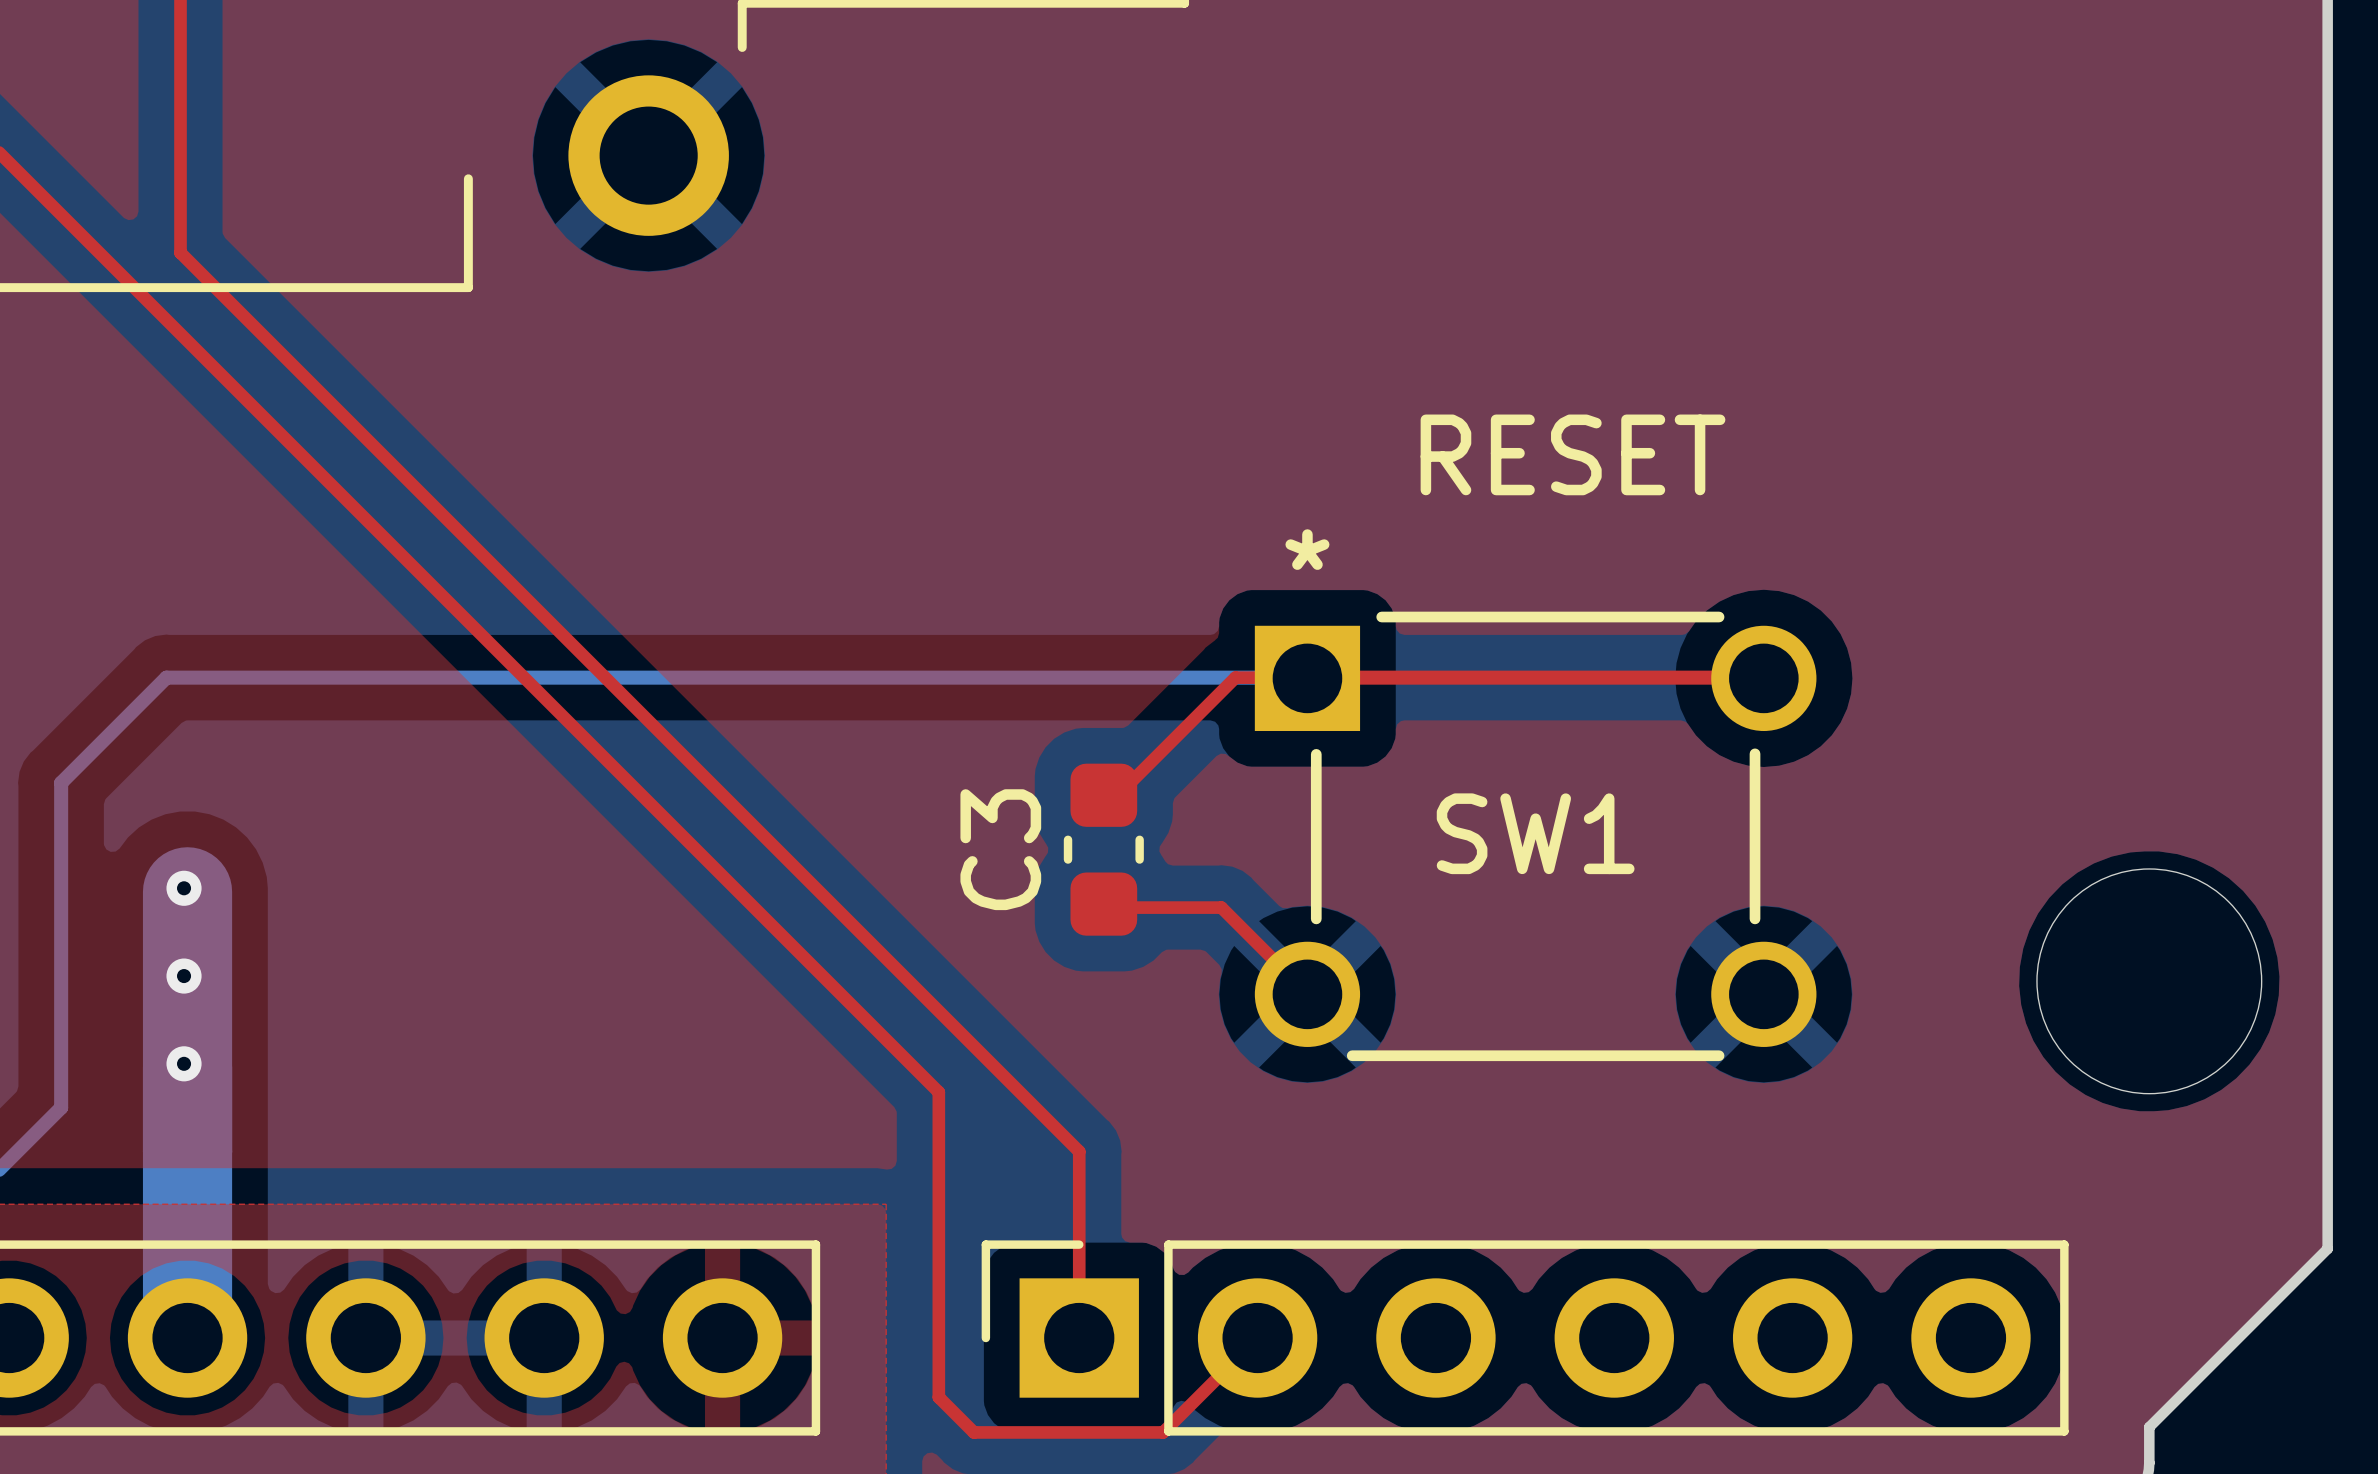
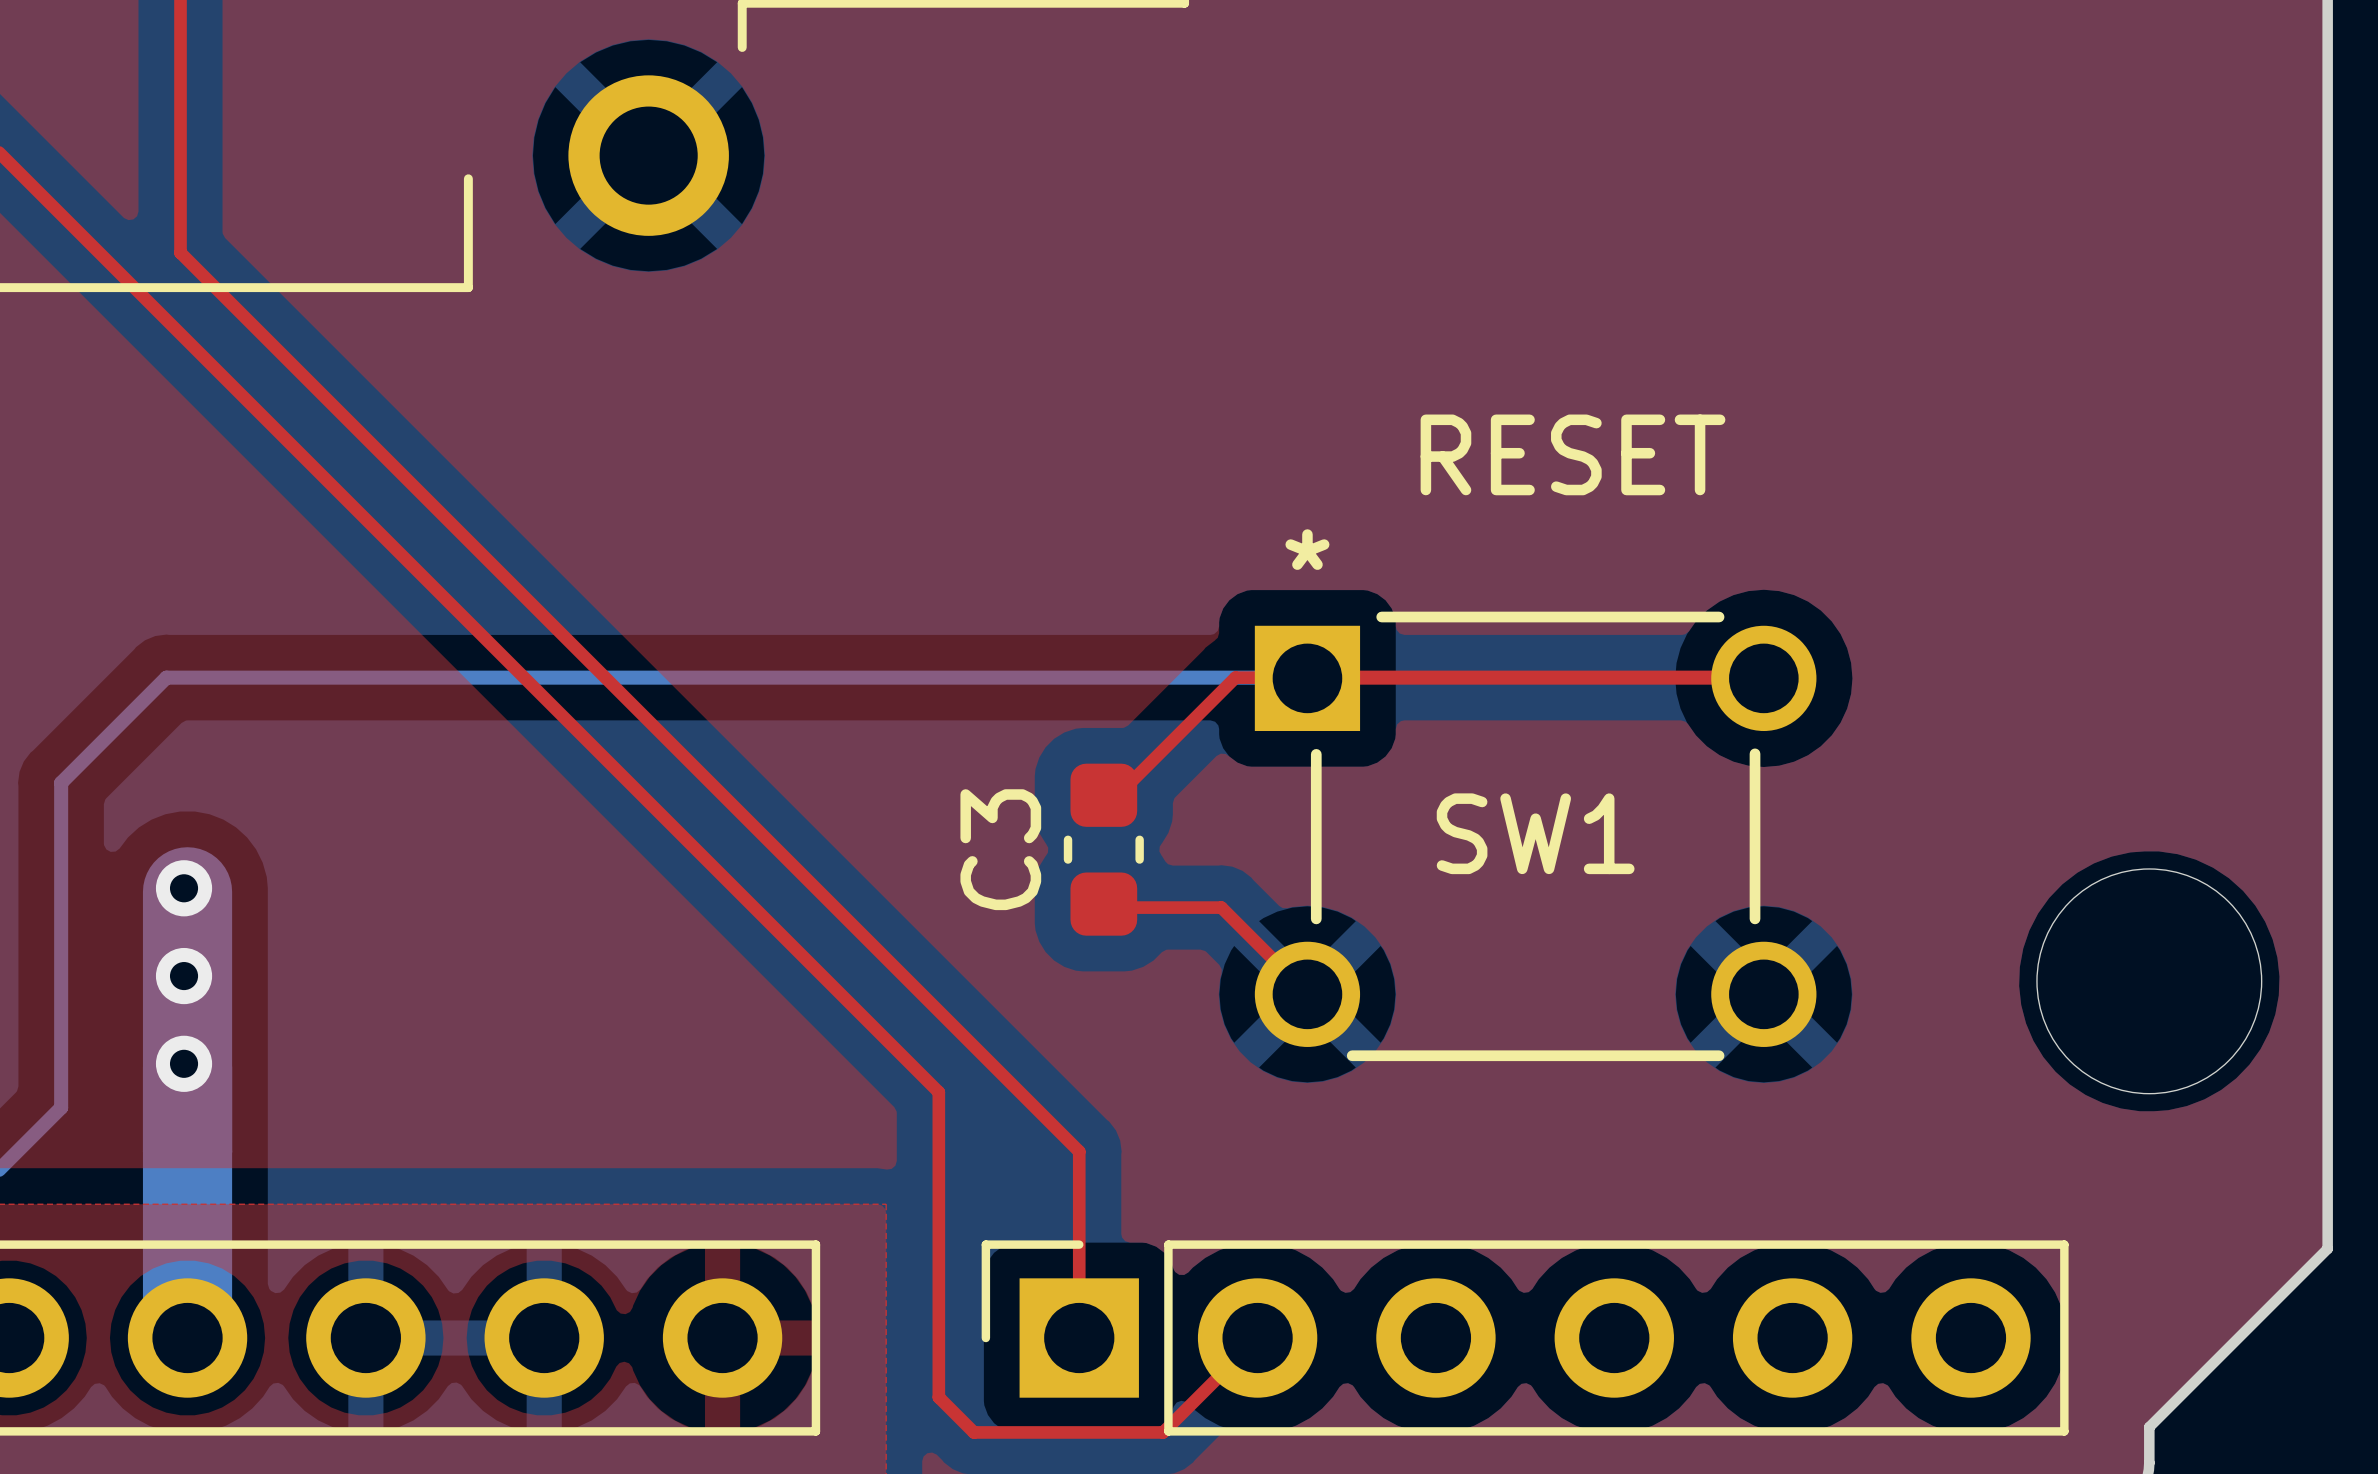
via size: [166, 870, 202, 906] -> [155, 860, 213, 917]
via size: [166, 958, 202, 994] -> [155, 947, 213, 1005]
via size: [166, 1046, 202, 1082] -> [155, 1035, 213, 1092]

